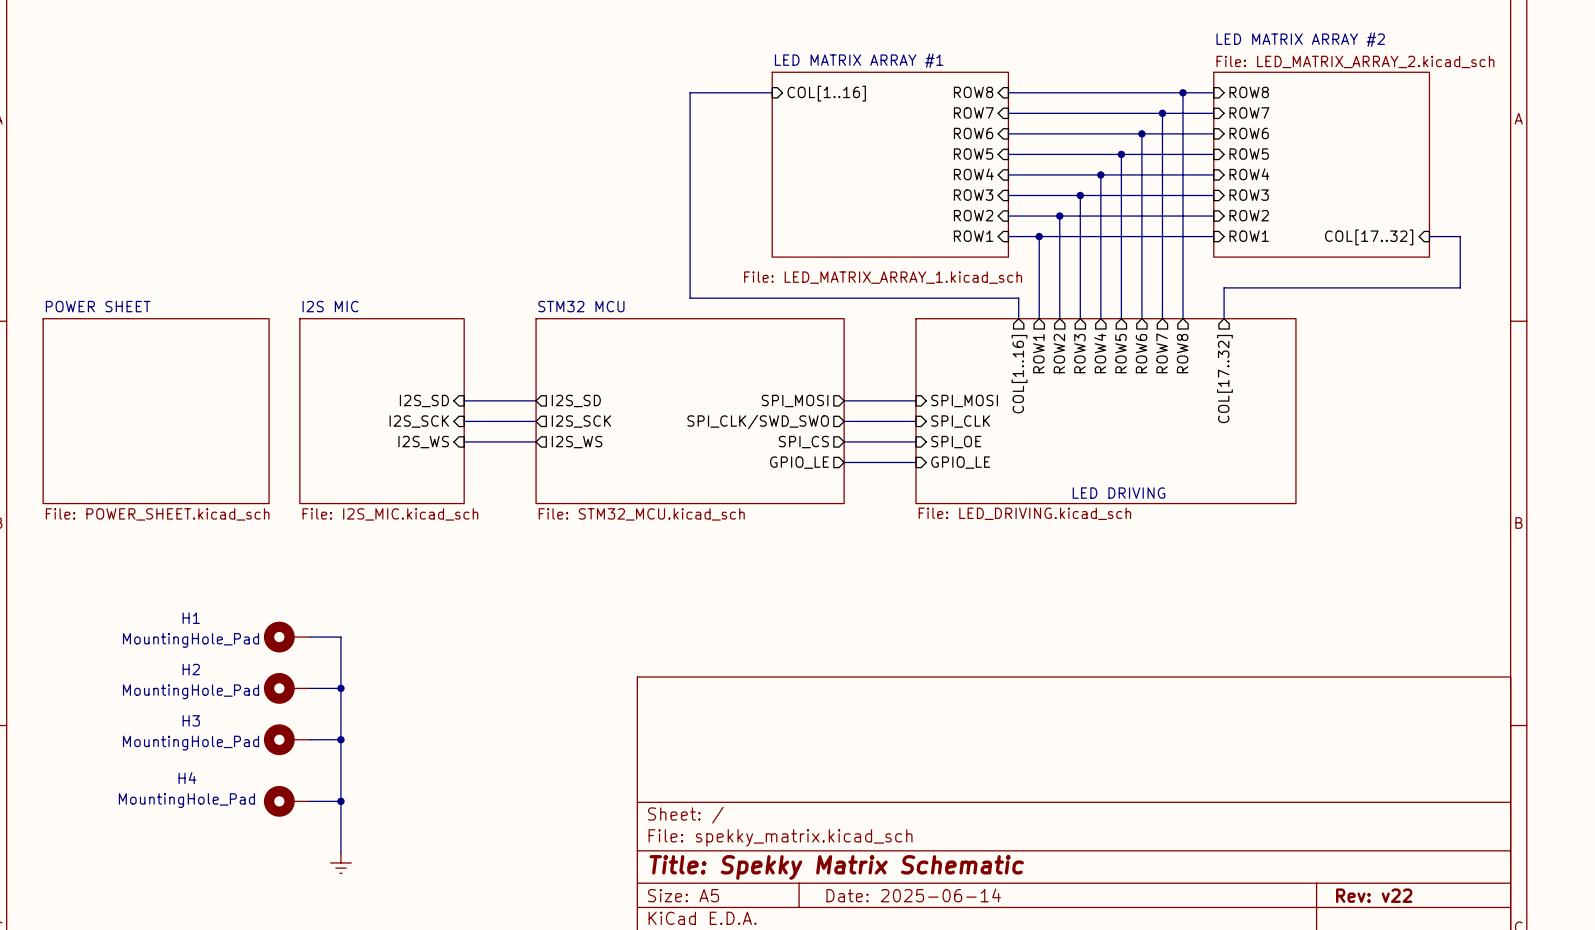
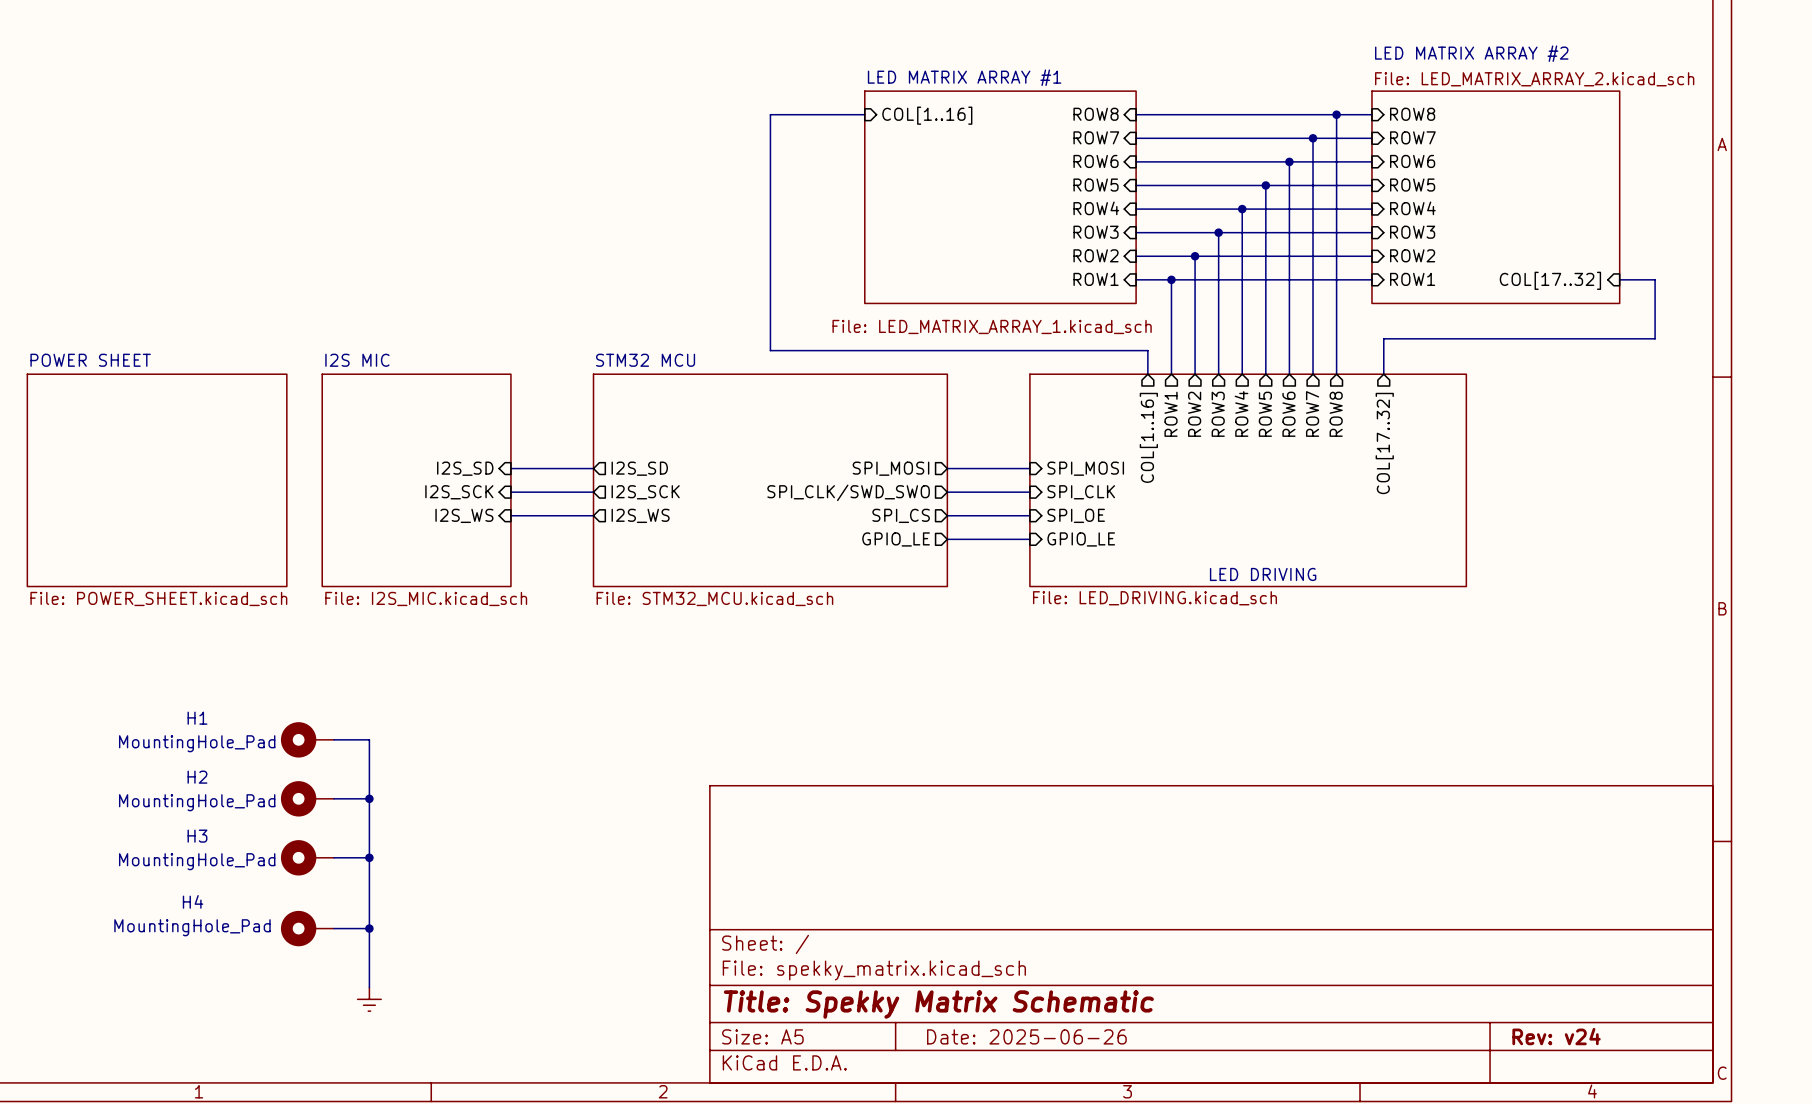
title block: Date: 2025-06-14 (913, 895) -> Date: 2025-06-26 (1026, 1036)
title block: Rev: v22 (1374, 895) -> Rev: v24 (1556, 1036)

